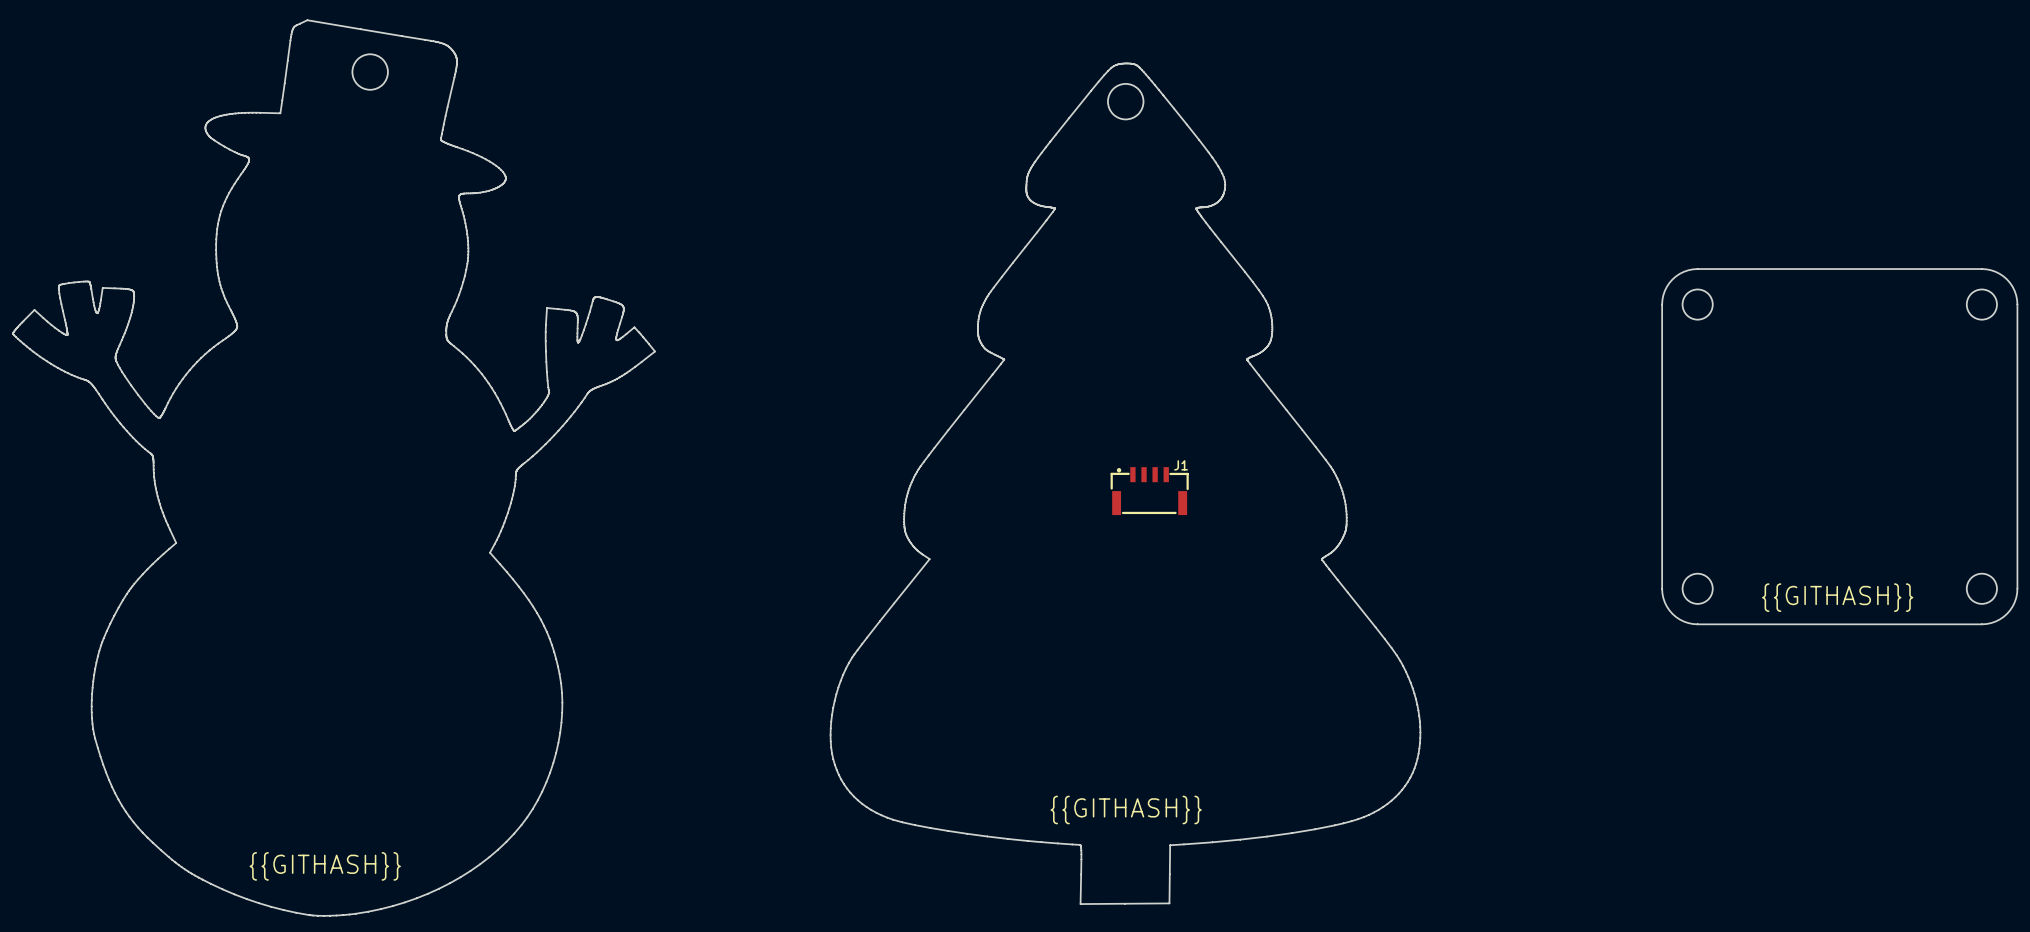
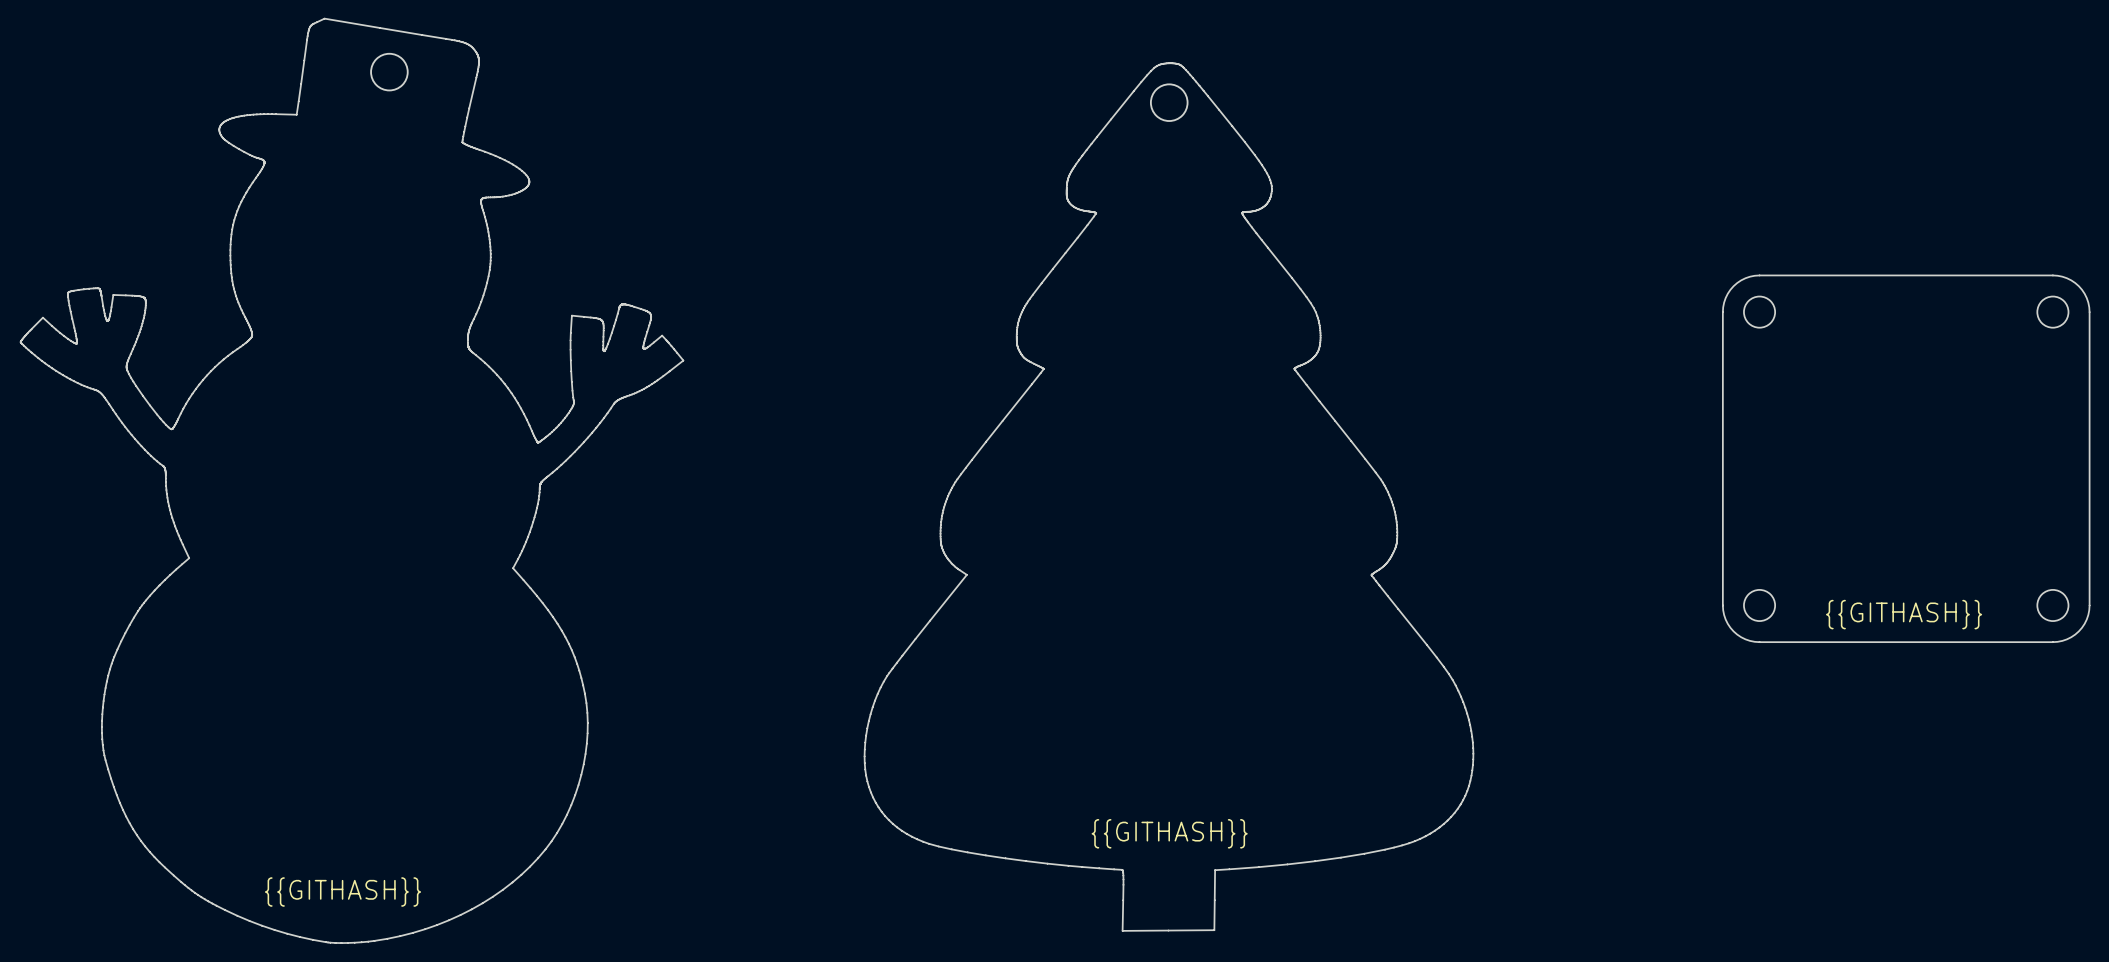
J1: (1149, 491) -> none

